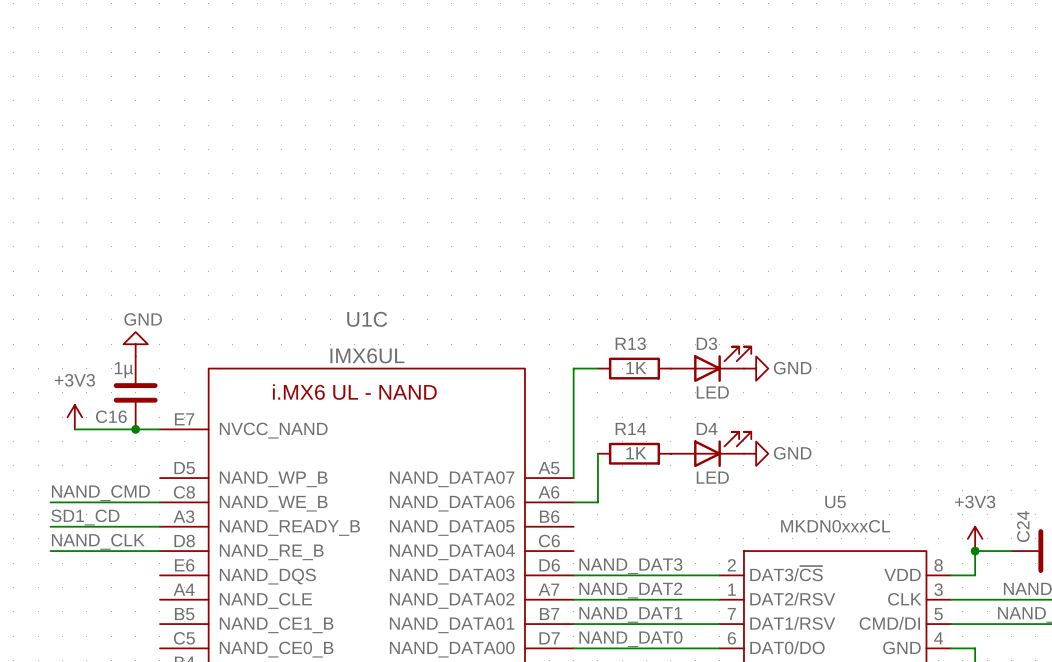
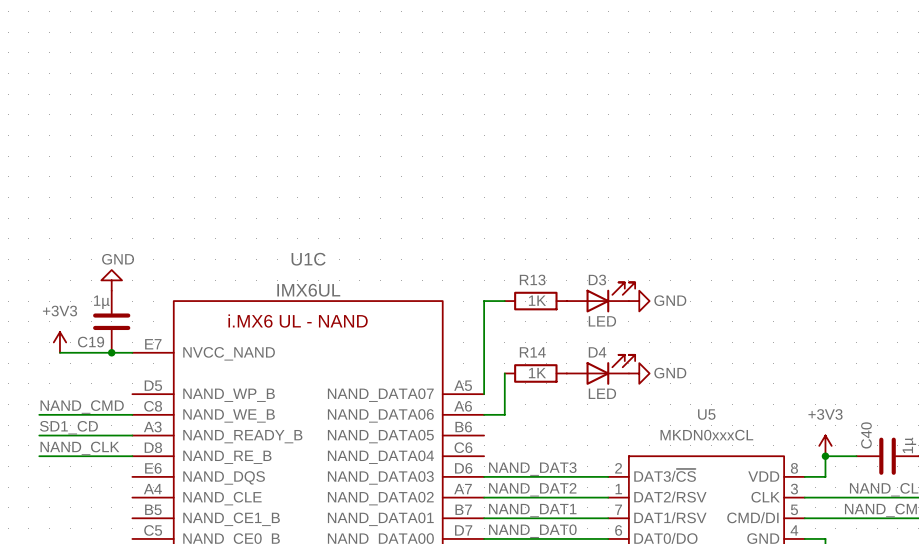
C16 name: C16 (111, 416) -> C19 (91, 342)
C24 name: C24 (1023, 526) -> C40 (866, 435)

